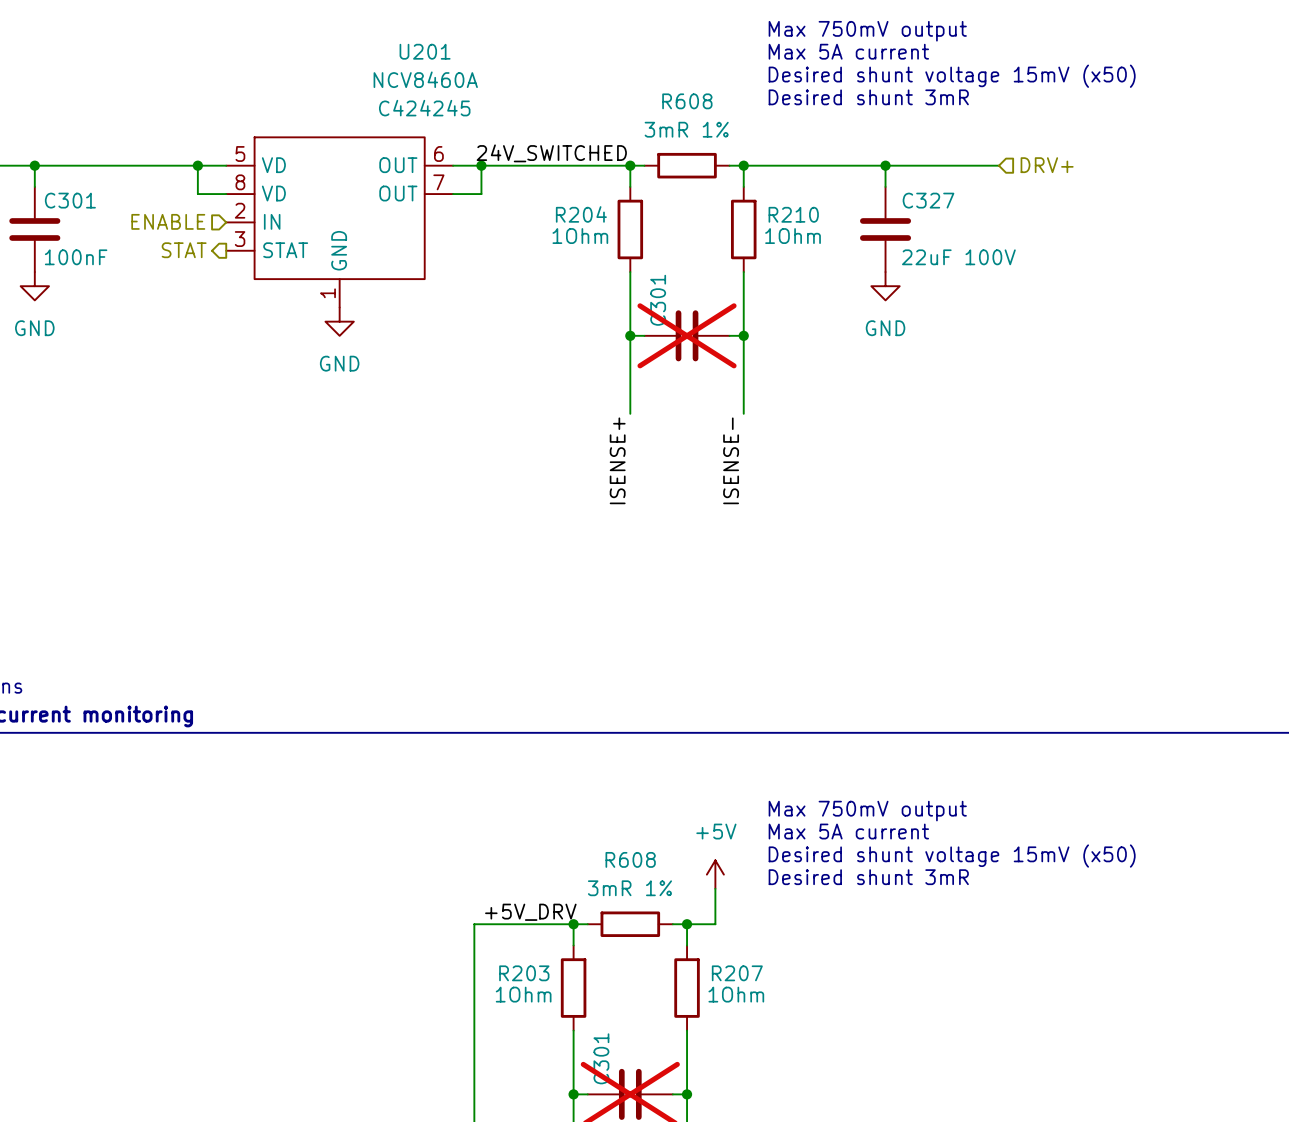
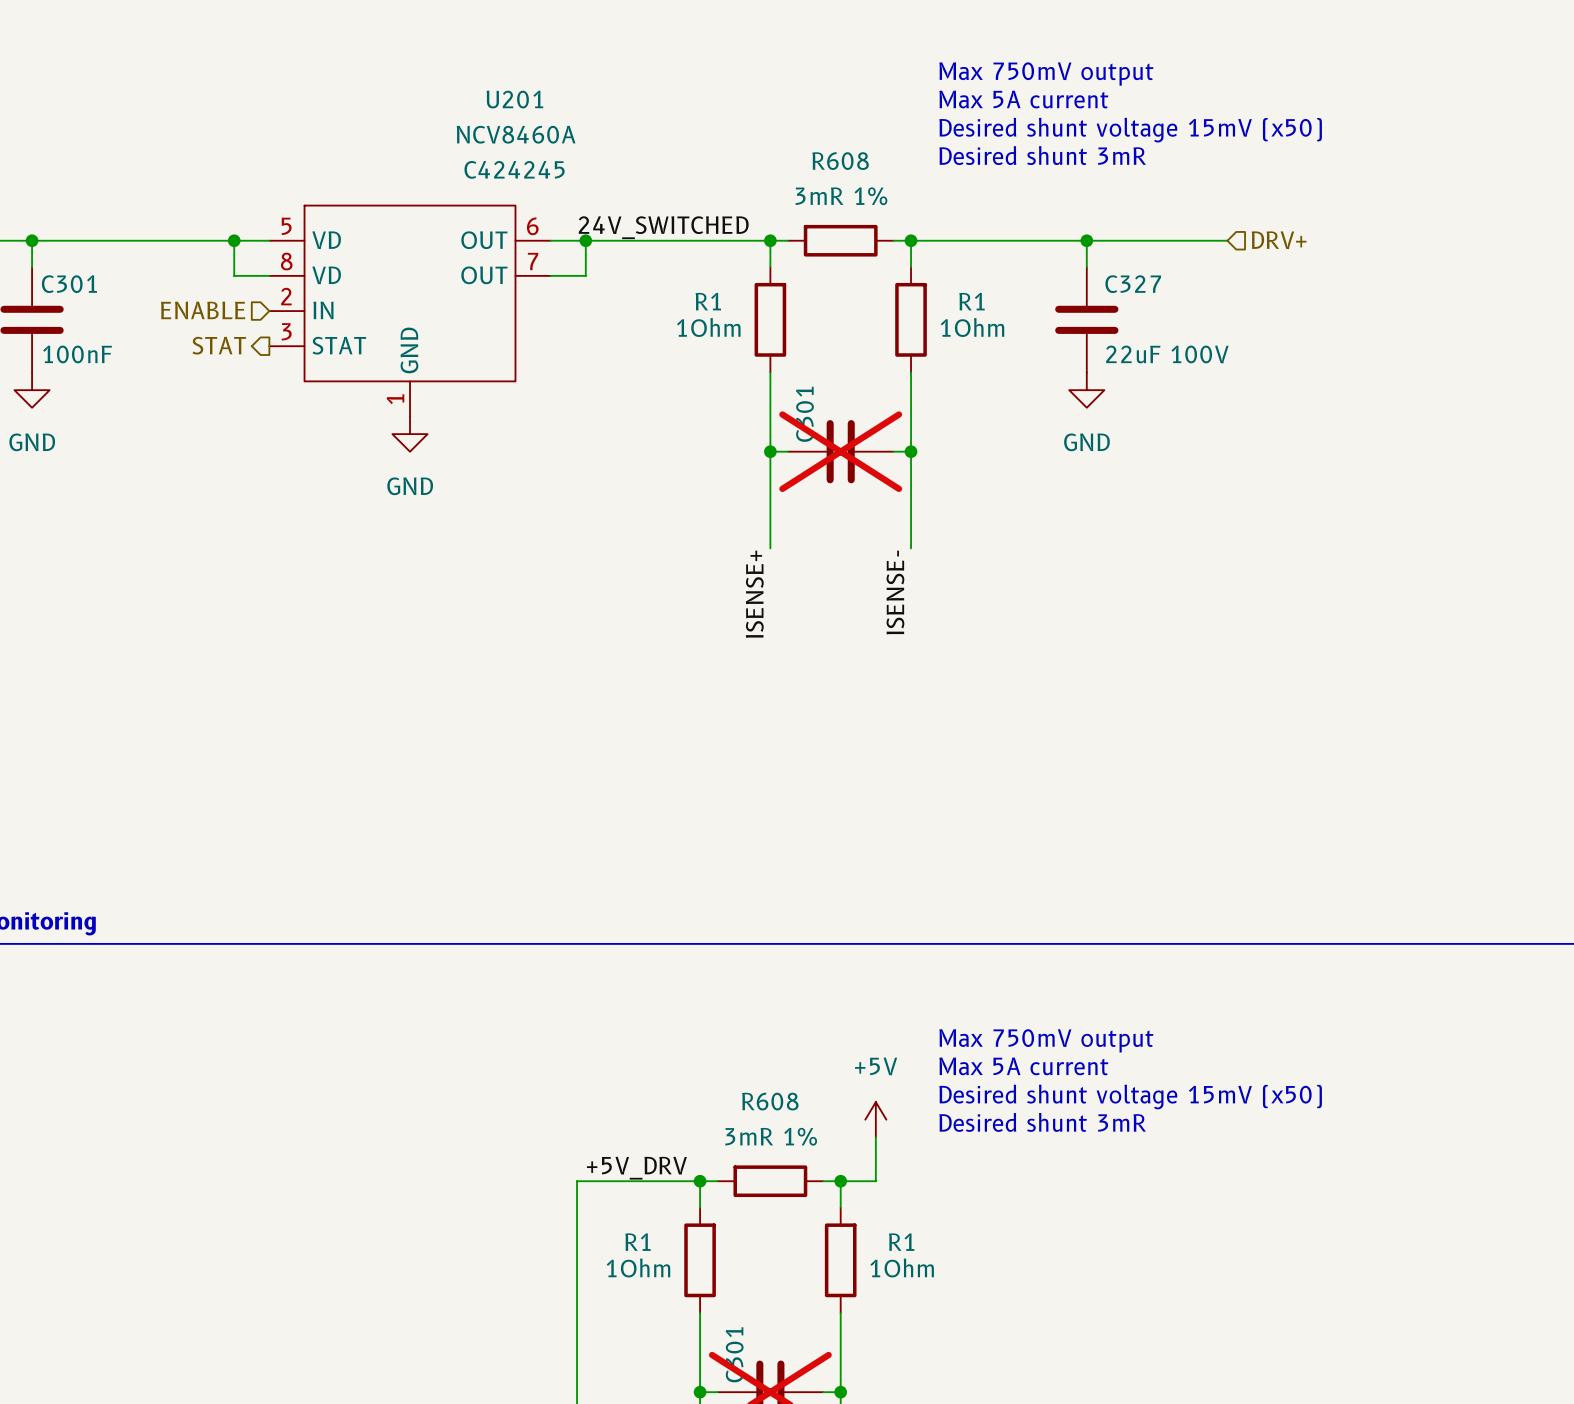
R204 name: R204 (581, 214) -> R1 (708, 301)
R210 name: R210 (793, 214) -> R1 (971, 301)
R203 name: R203 (524, 973) -> R1 (637, 1242)
R207 name: R207 (737, 973) -> R1 (901, 1242)

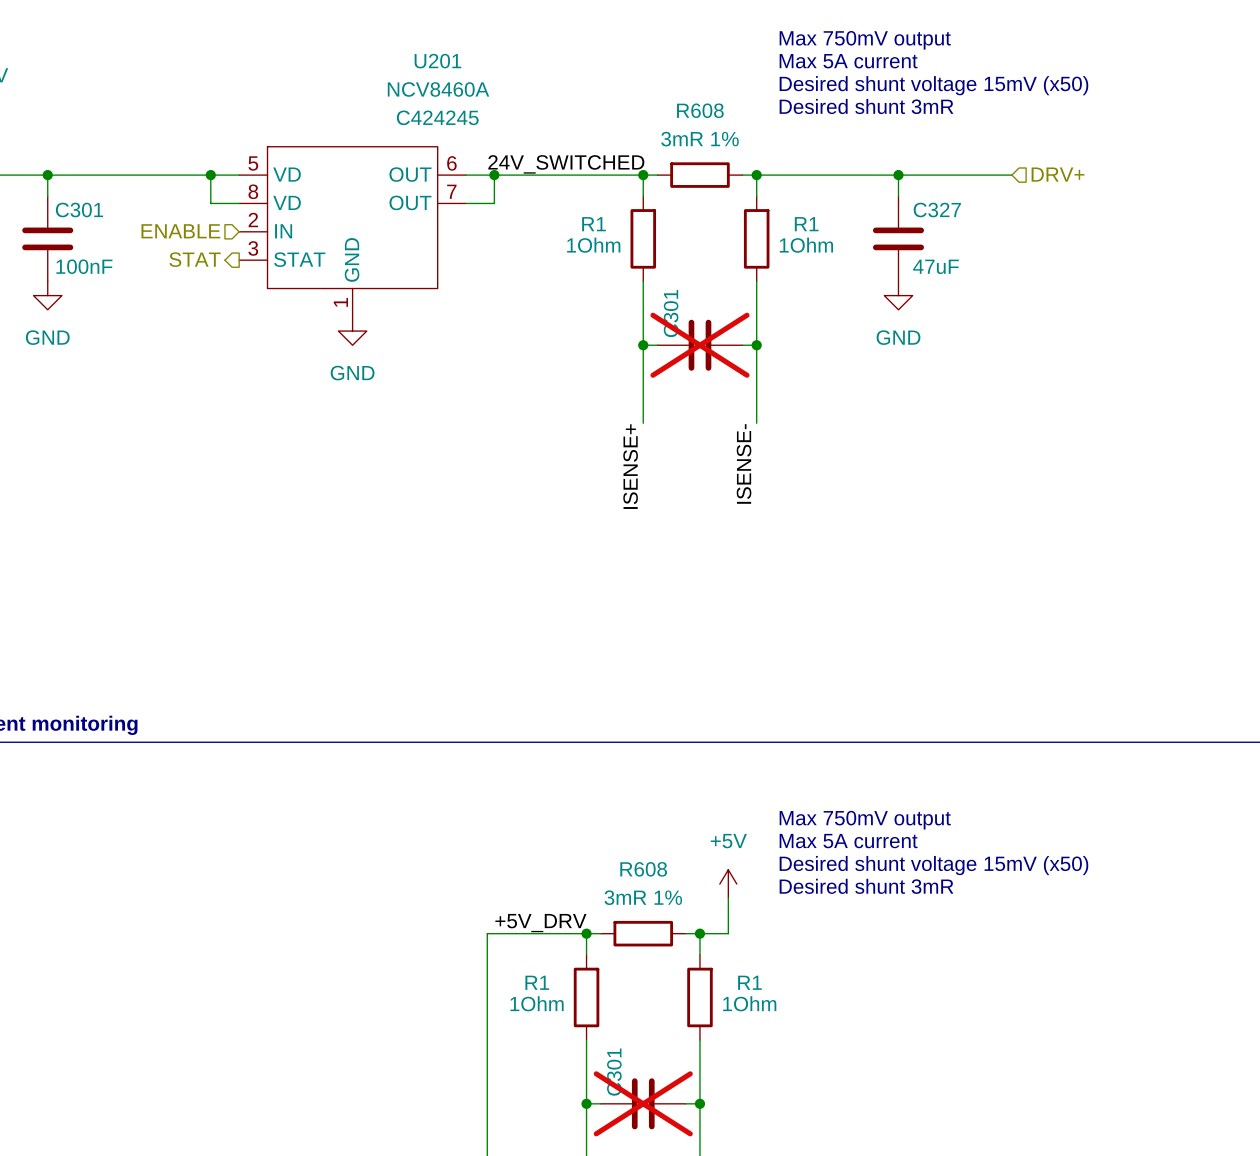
C327 value: 22uF 100V (1167, 354) -> 47uF (935, 266)

